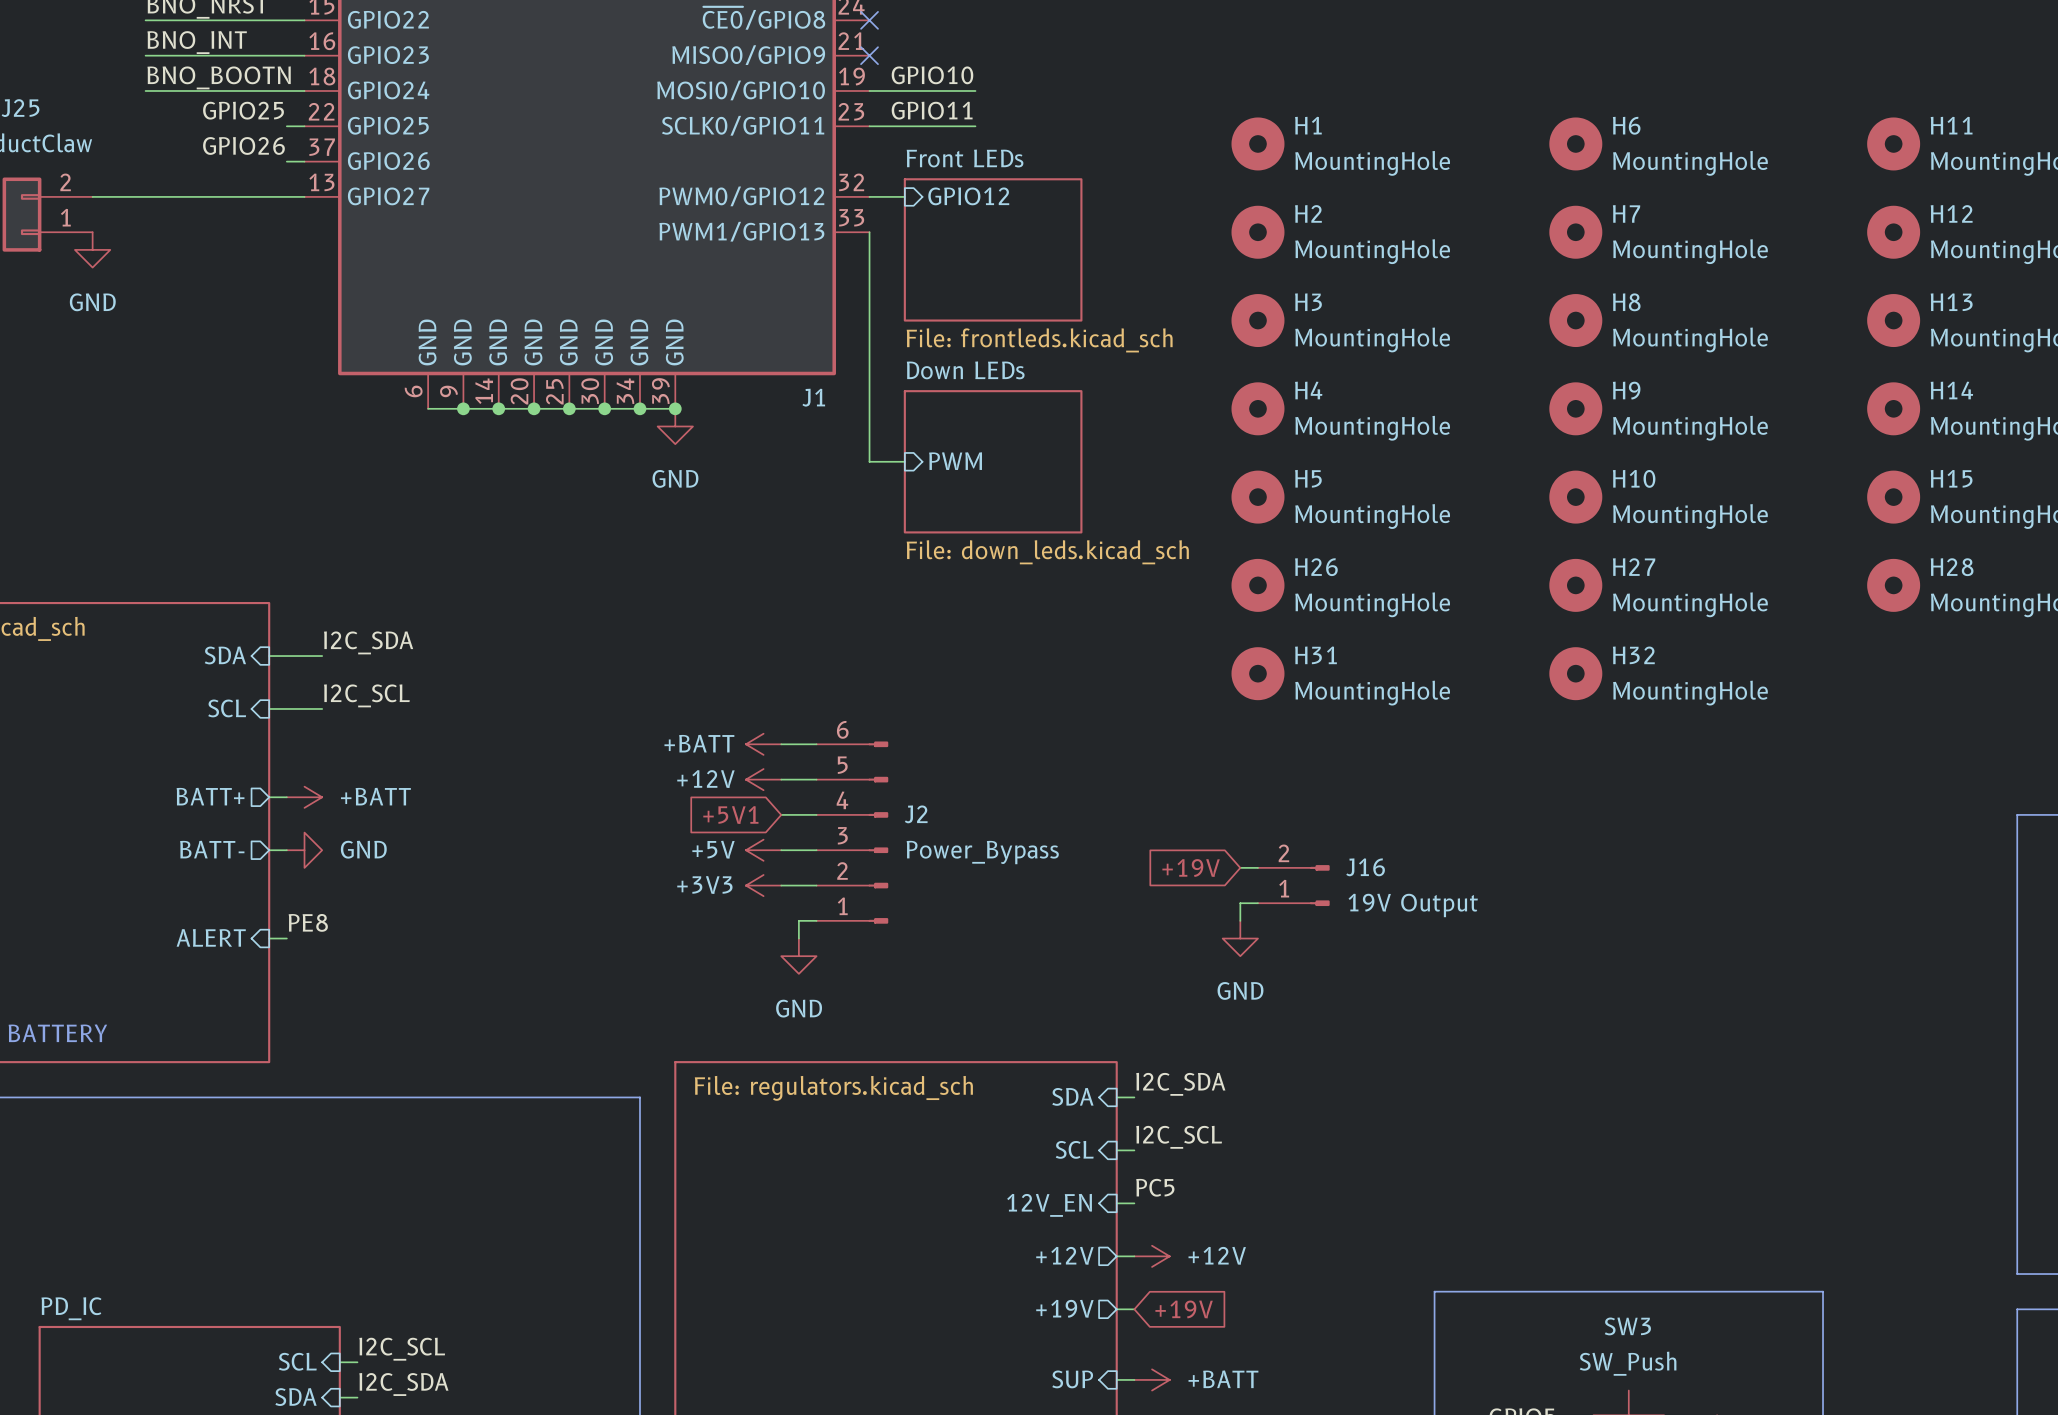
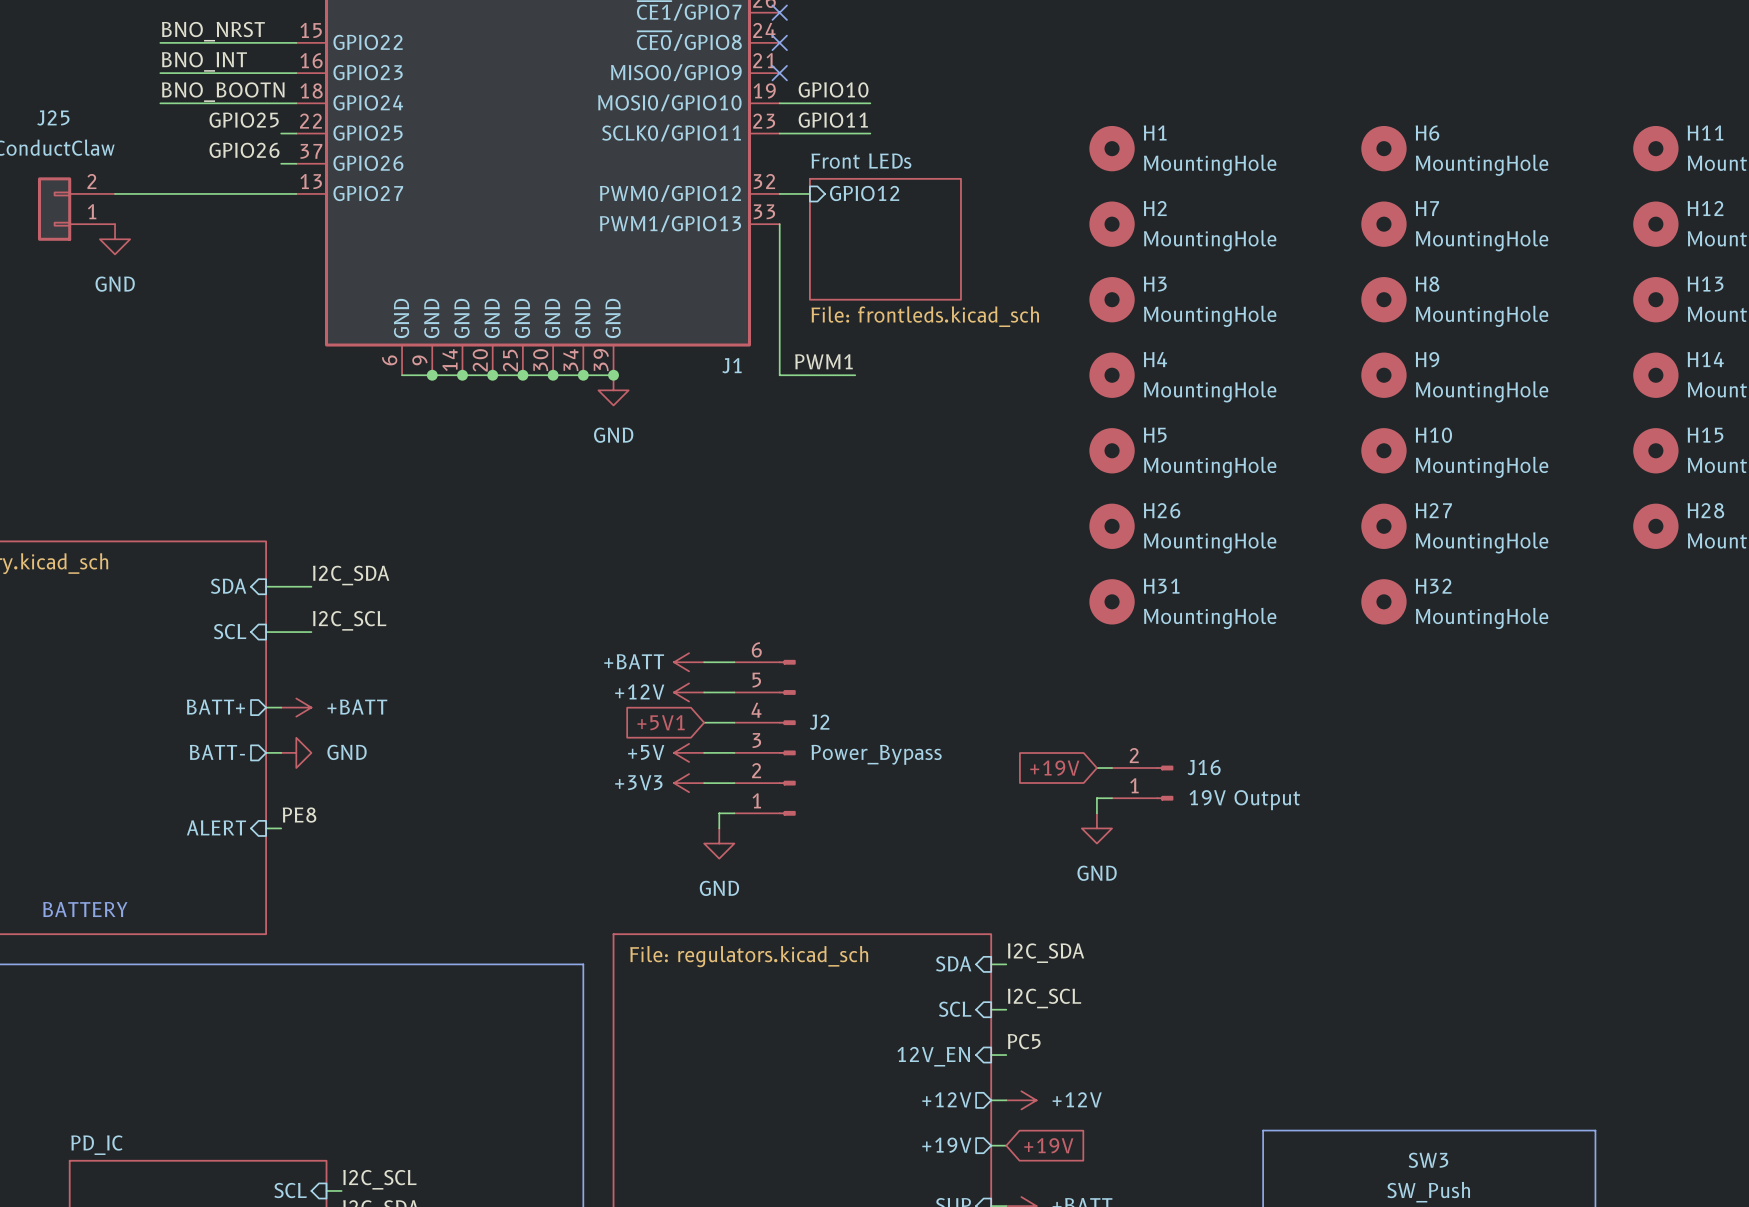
label: none -> PWM1 (823, 361)
wire: (869, 408) (869, 461) (904, 461) -> (779, 375) (855, 375)
sheet pin: PWM (955, 461) -> none
sheet Down LEDs: File: down_leds.kicad_sch (993, 461) -> none

